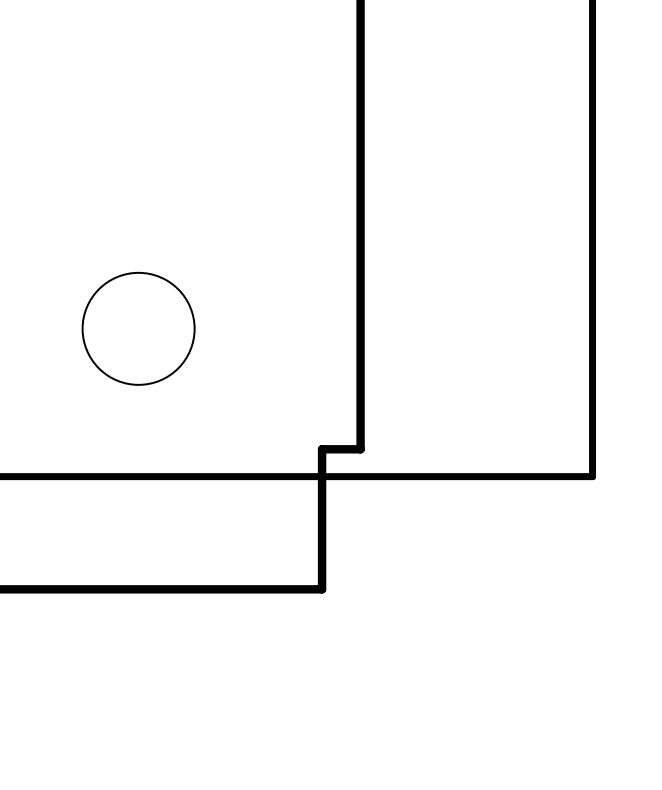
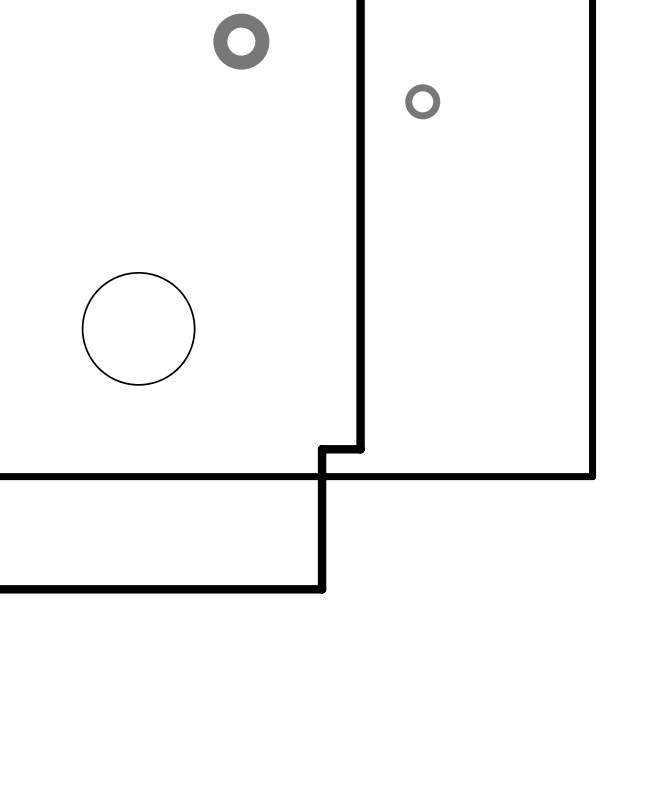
via: none -> (241, 41)
via: none -> (422, 101)

